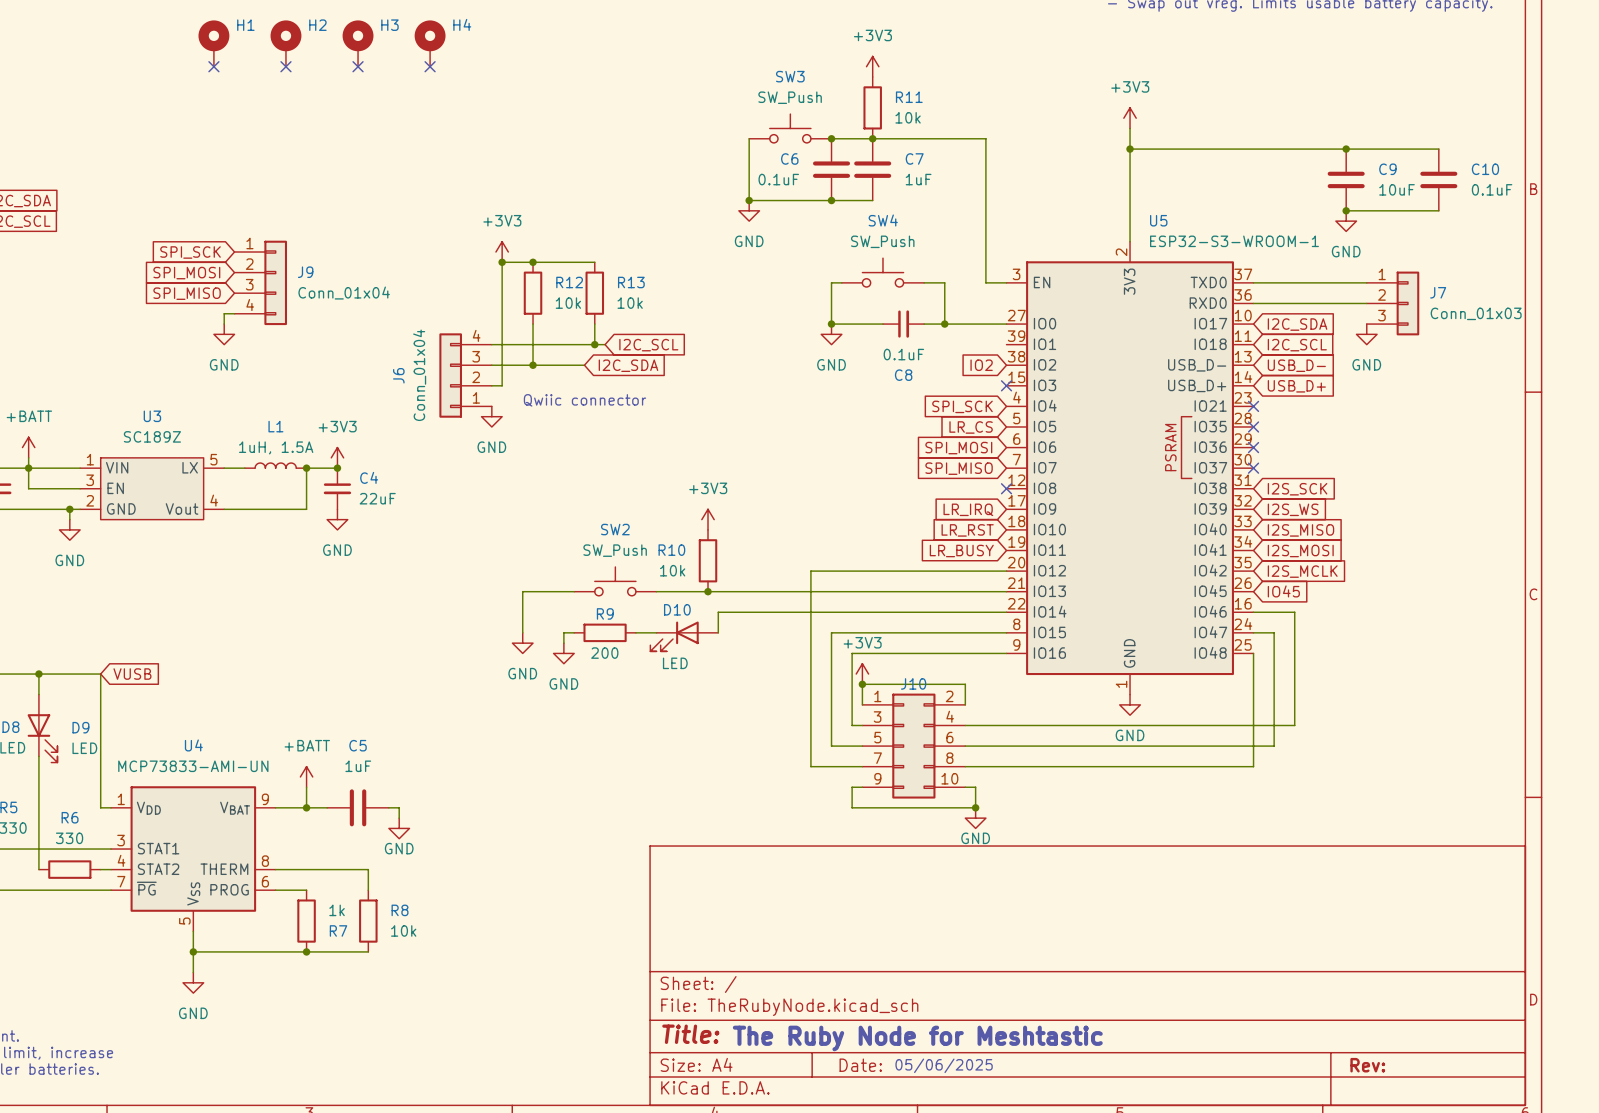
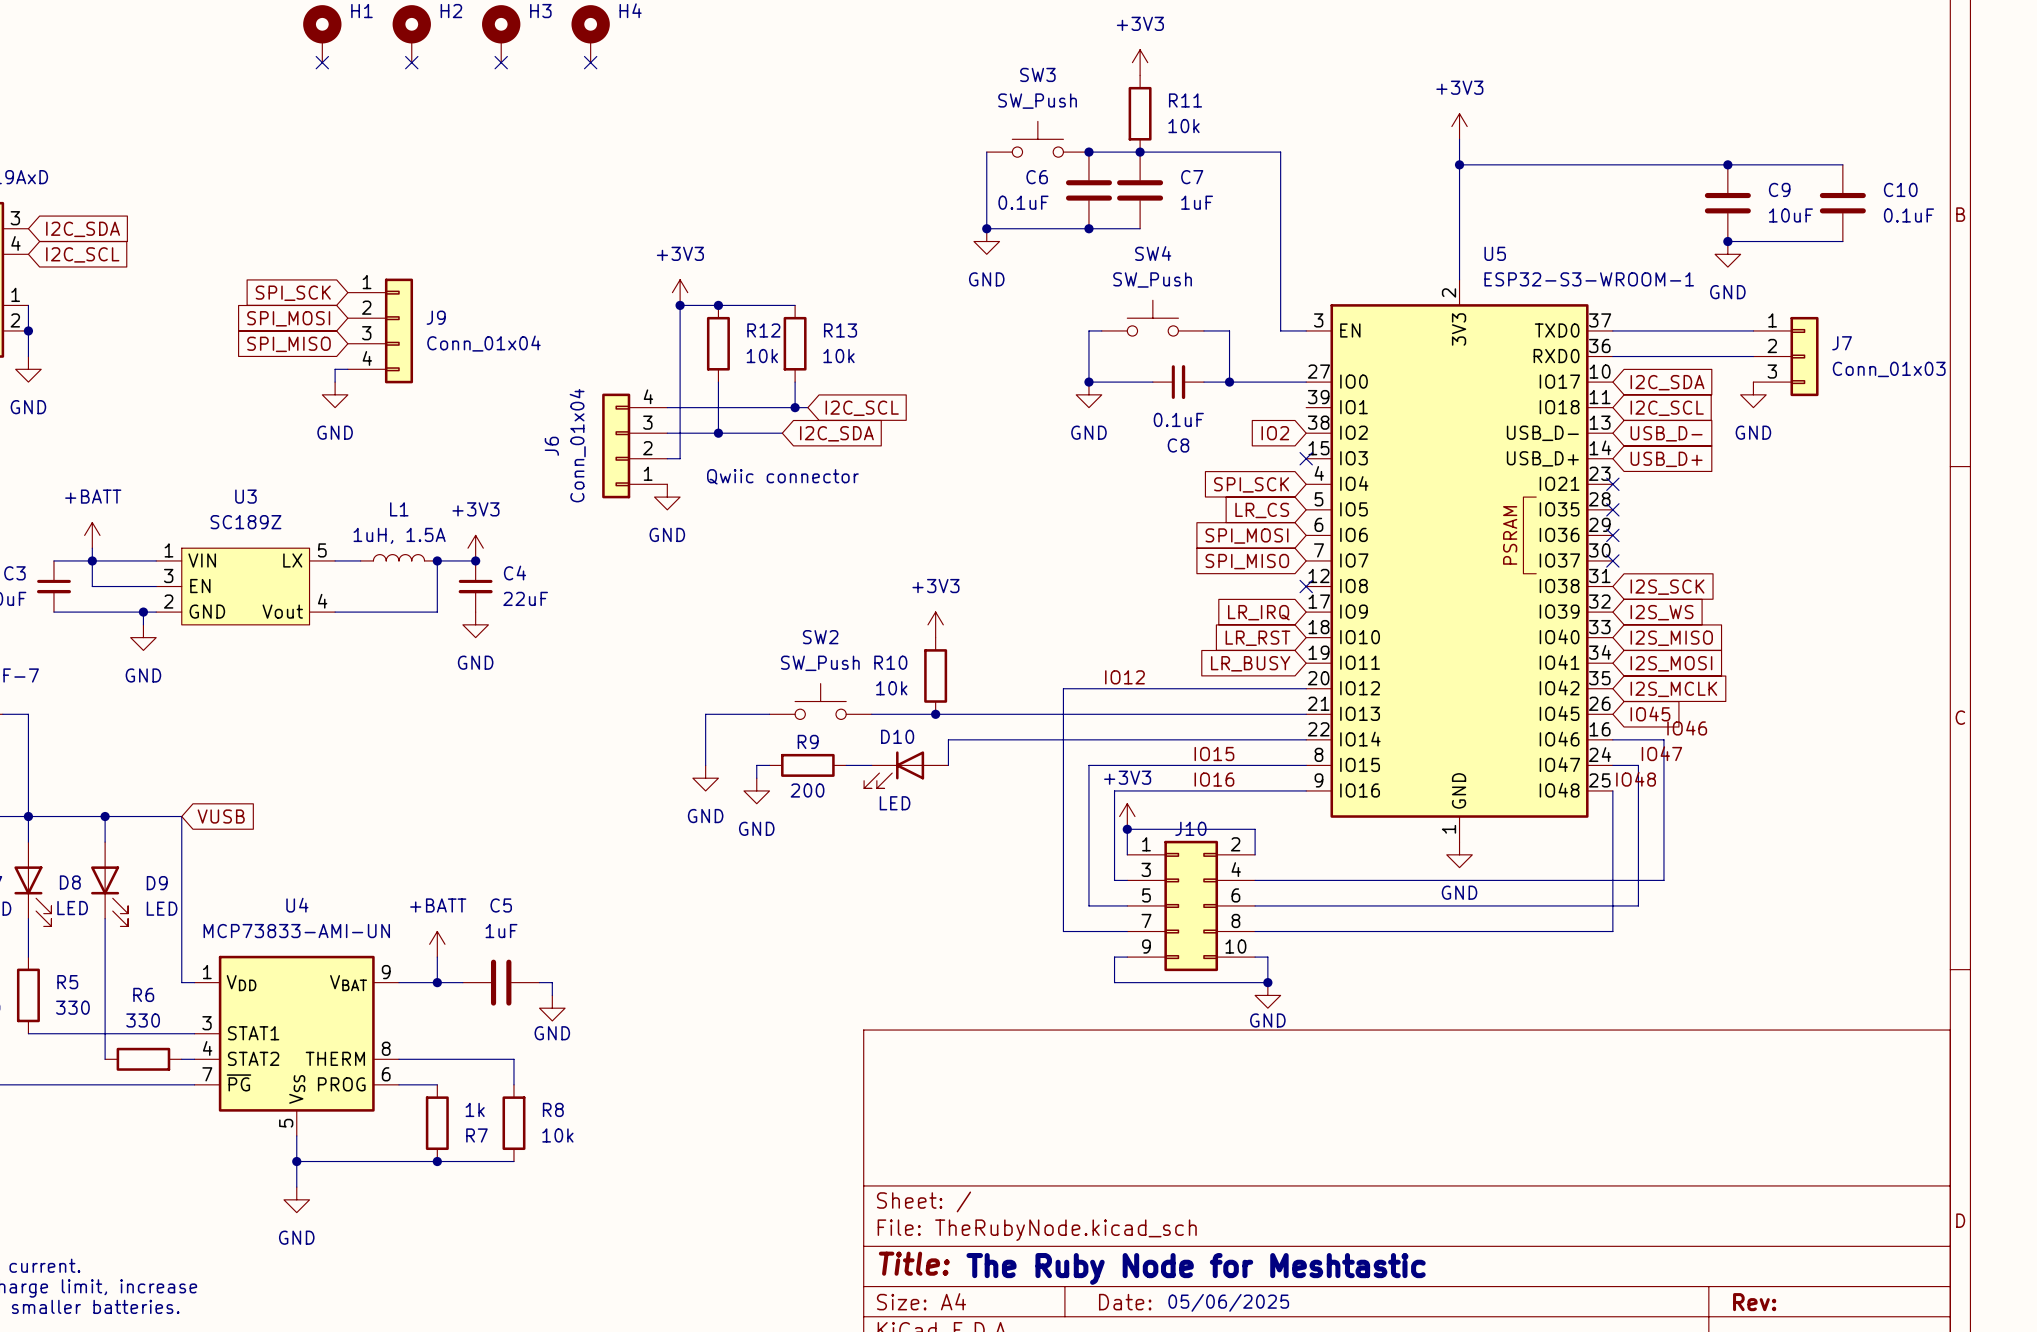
label: none -> IO12 (1124, 677)
label: none -> IO46 (1687, 728)
label: none -> IO15 (1214, 754)
label: none -> IO47 (1661, 753)
label: none -> IO16 (1214, 779)
label: none -> IO48 (1636, 779)

